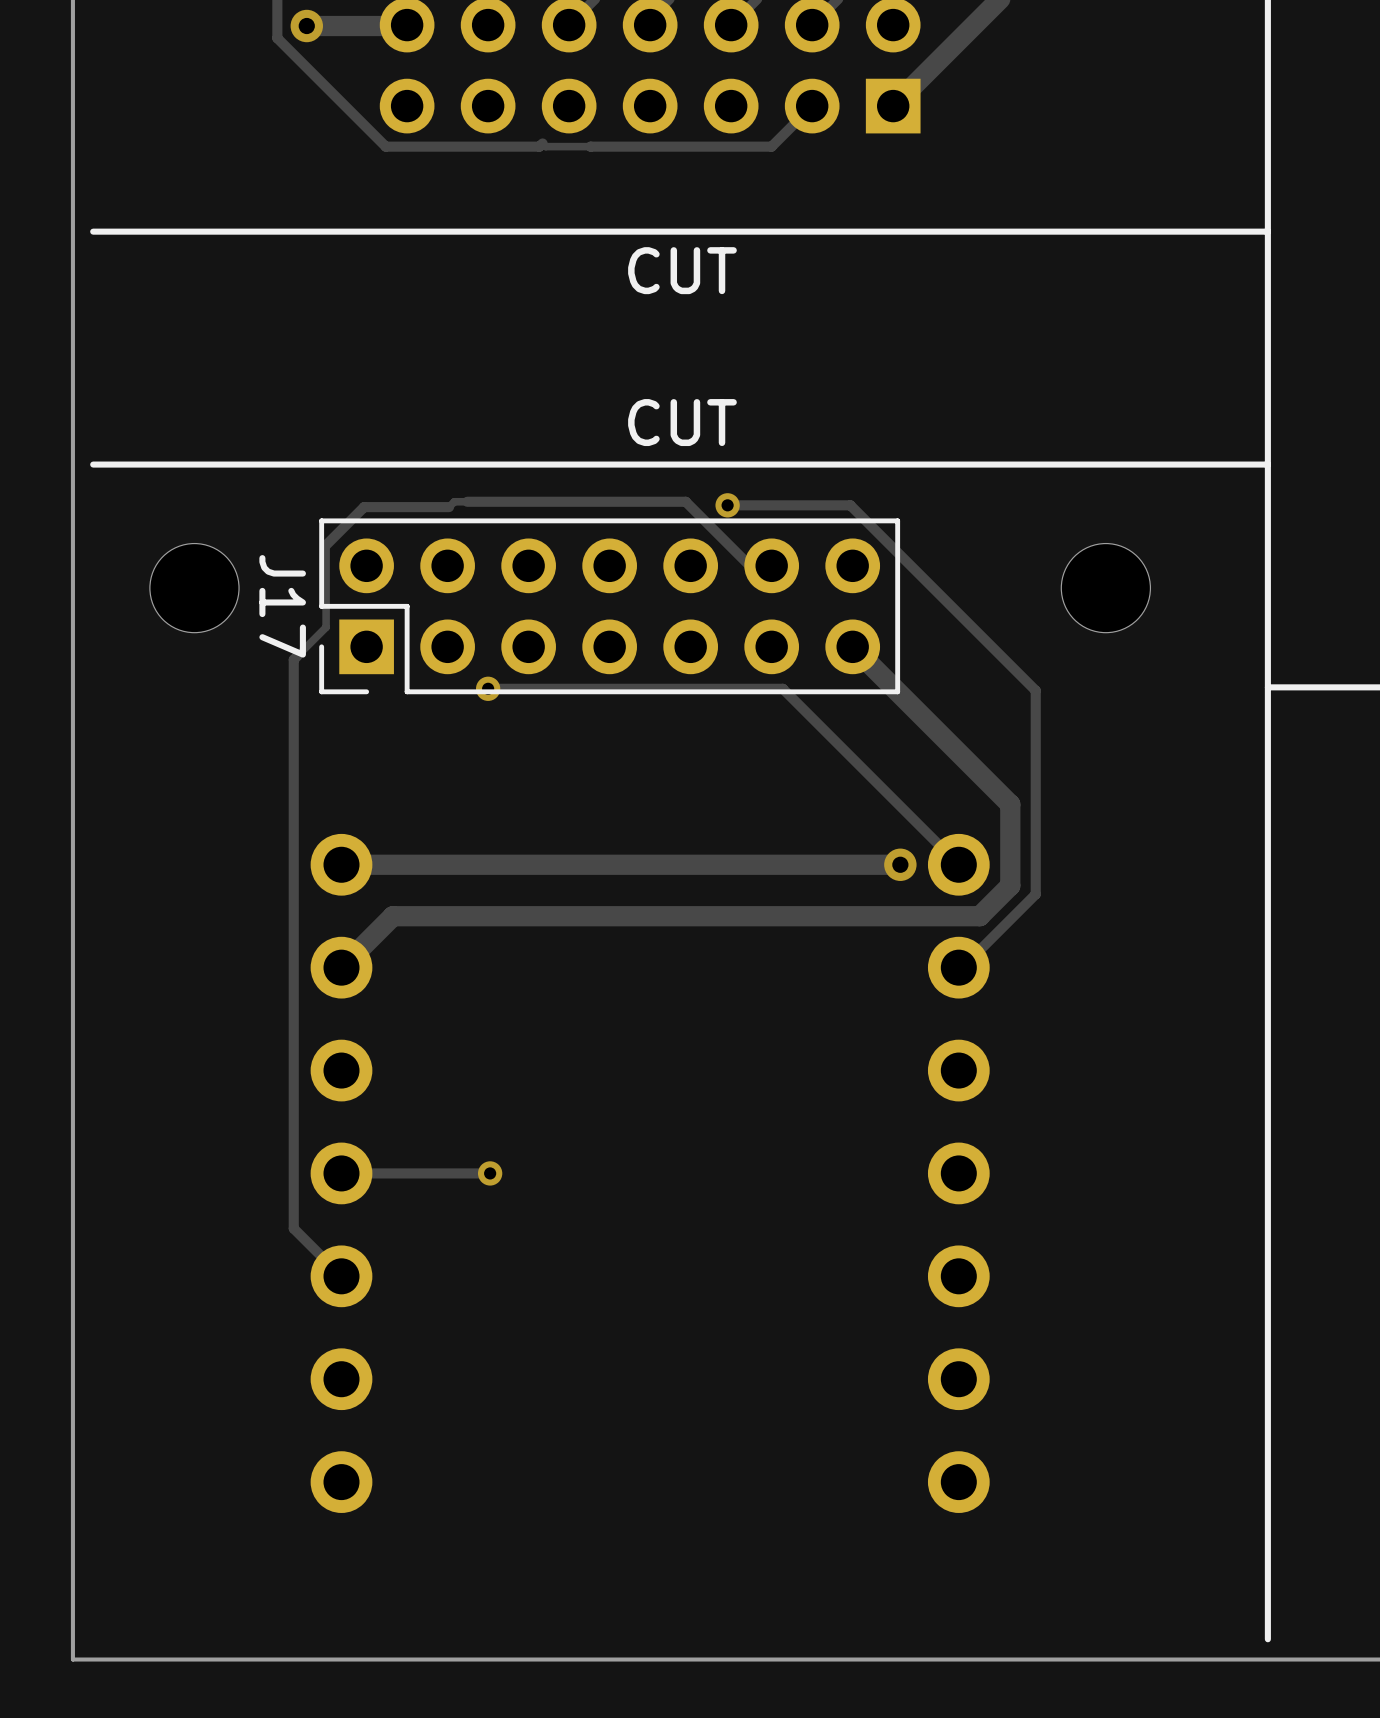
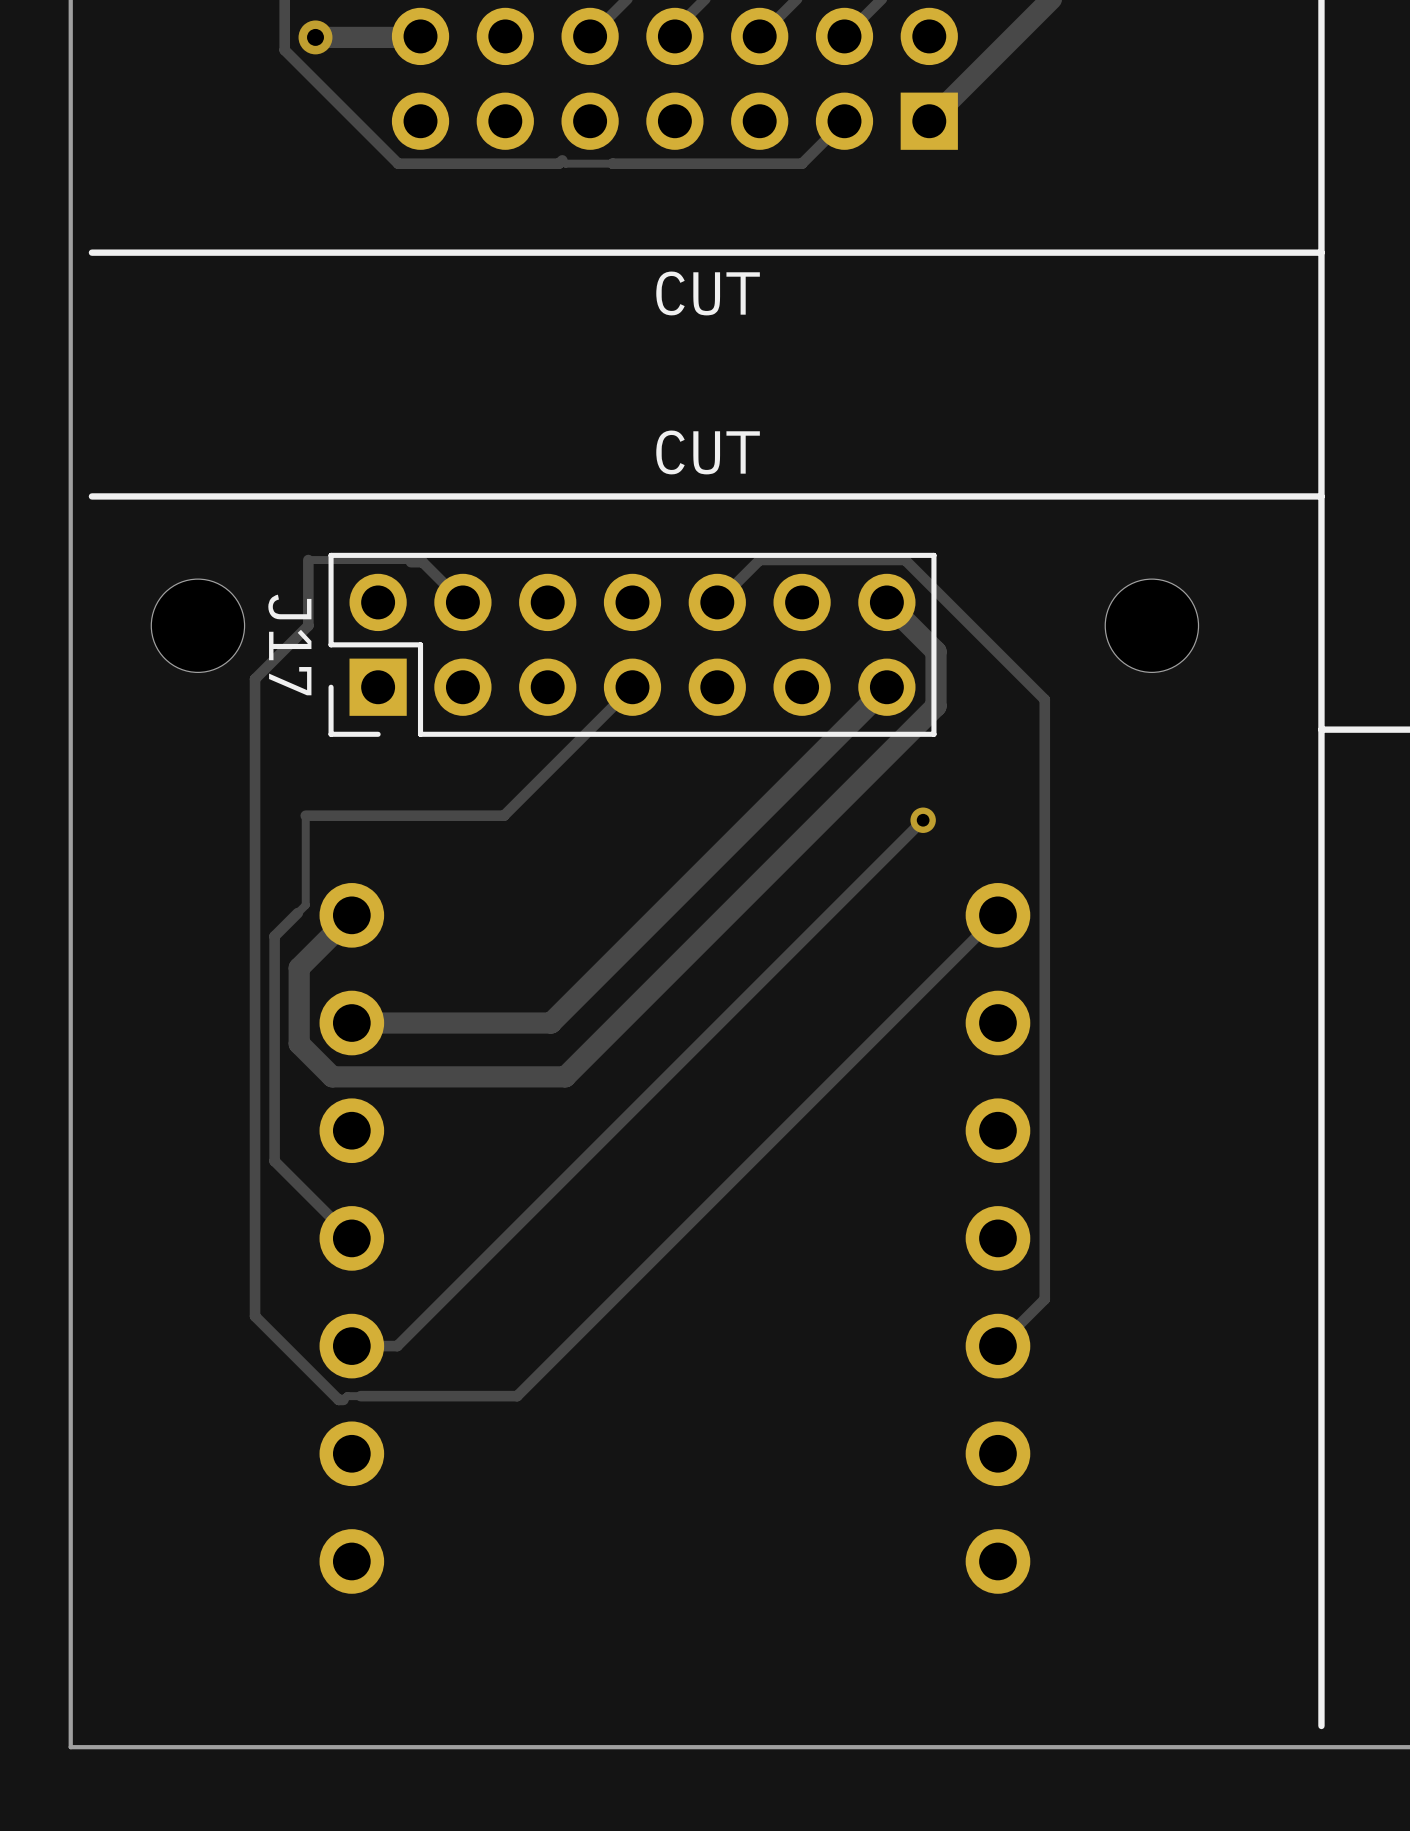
track: (727, 505) (850, 505) (870, 525) -> (717, 602) (759, 559) (905, 559)
via: (727, 505) -> none
track: (771, 565) (749, 565) (685, 501) (454, 501) (449, 507) (364, 507) (326, 545) (326, 627) (293, 659) (293, 1228) (341, 1276) -> (923, 820) (397, 1346) (351, 1346)
track: (852, 646) (1010, 804) (1010, 885) (979, 916) (392, 916) (341, 967) -> (886, 687) (551, 1023) (351, 1023)
track: (1003, 658) (1035, 690) (1035, 894) (962, 967) (958, 967) -> (1044, 699) (1044, 1299) (997, 1346)
track: (488, 688) (782, 688) (958, 864) -> (462, 602) (422, 562) (410, 562) (408, 560) (308, 560) (308, 625) (255, 679) (255, 1316) (338, 1399) (343, 1399) (347, 1396) (517, 1396) (997, 915)
via: (488, 688) -> none
via: none -> (923, 820)
track: (900, 864) (341, 864) -> (886, 602) (936, 651) (936, 706) (565, 1076) (332, 1076) (299, 1043) (299, 967) (351, 915)
via: (900, 864) -> none
track: (490, 1173) (341, 1173) -> (632, 687) (504, 815) (305, 815) (305, 905) (274, 936) (274, 1161) (351, 1238)
via: (490, 1173) -> none

